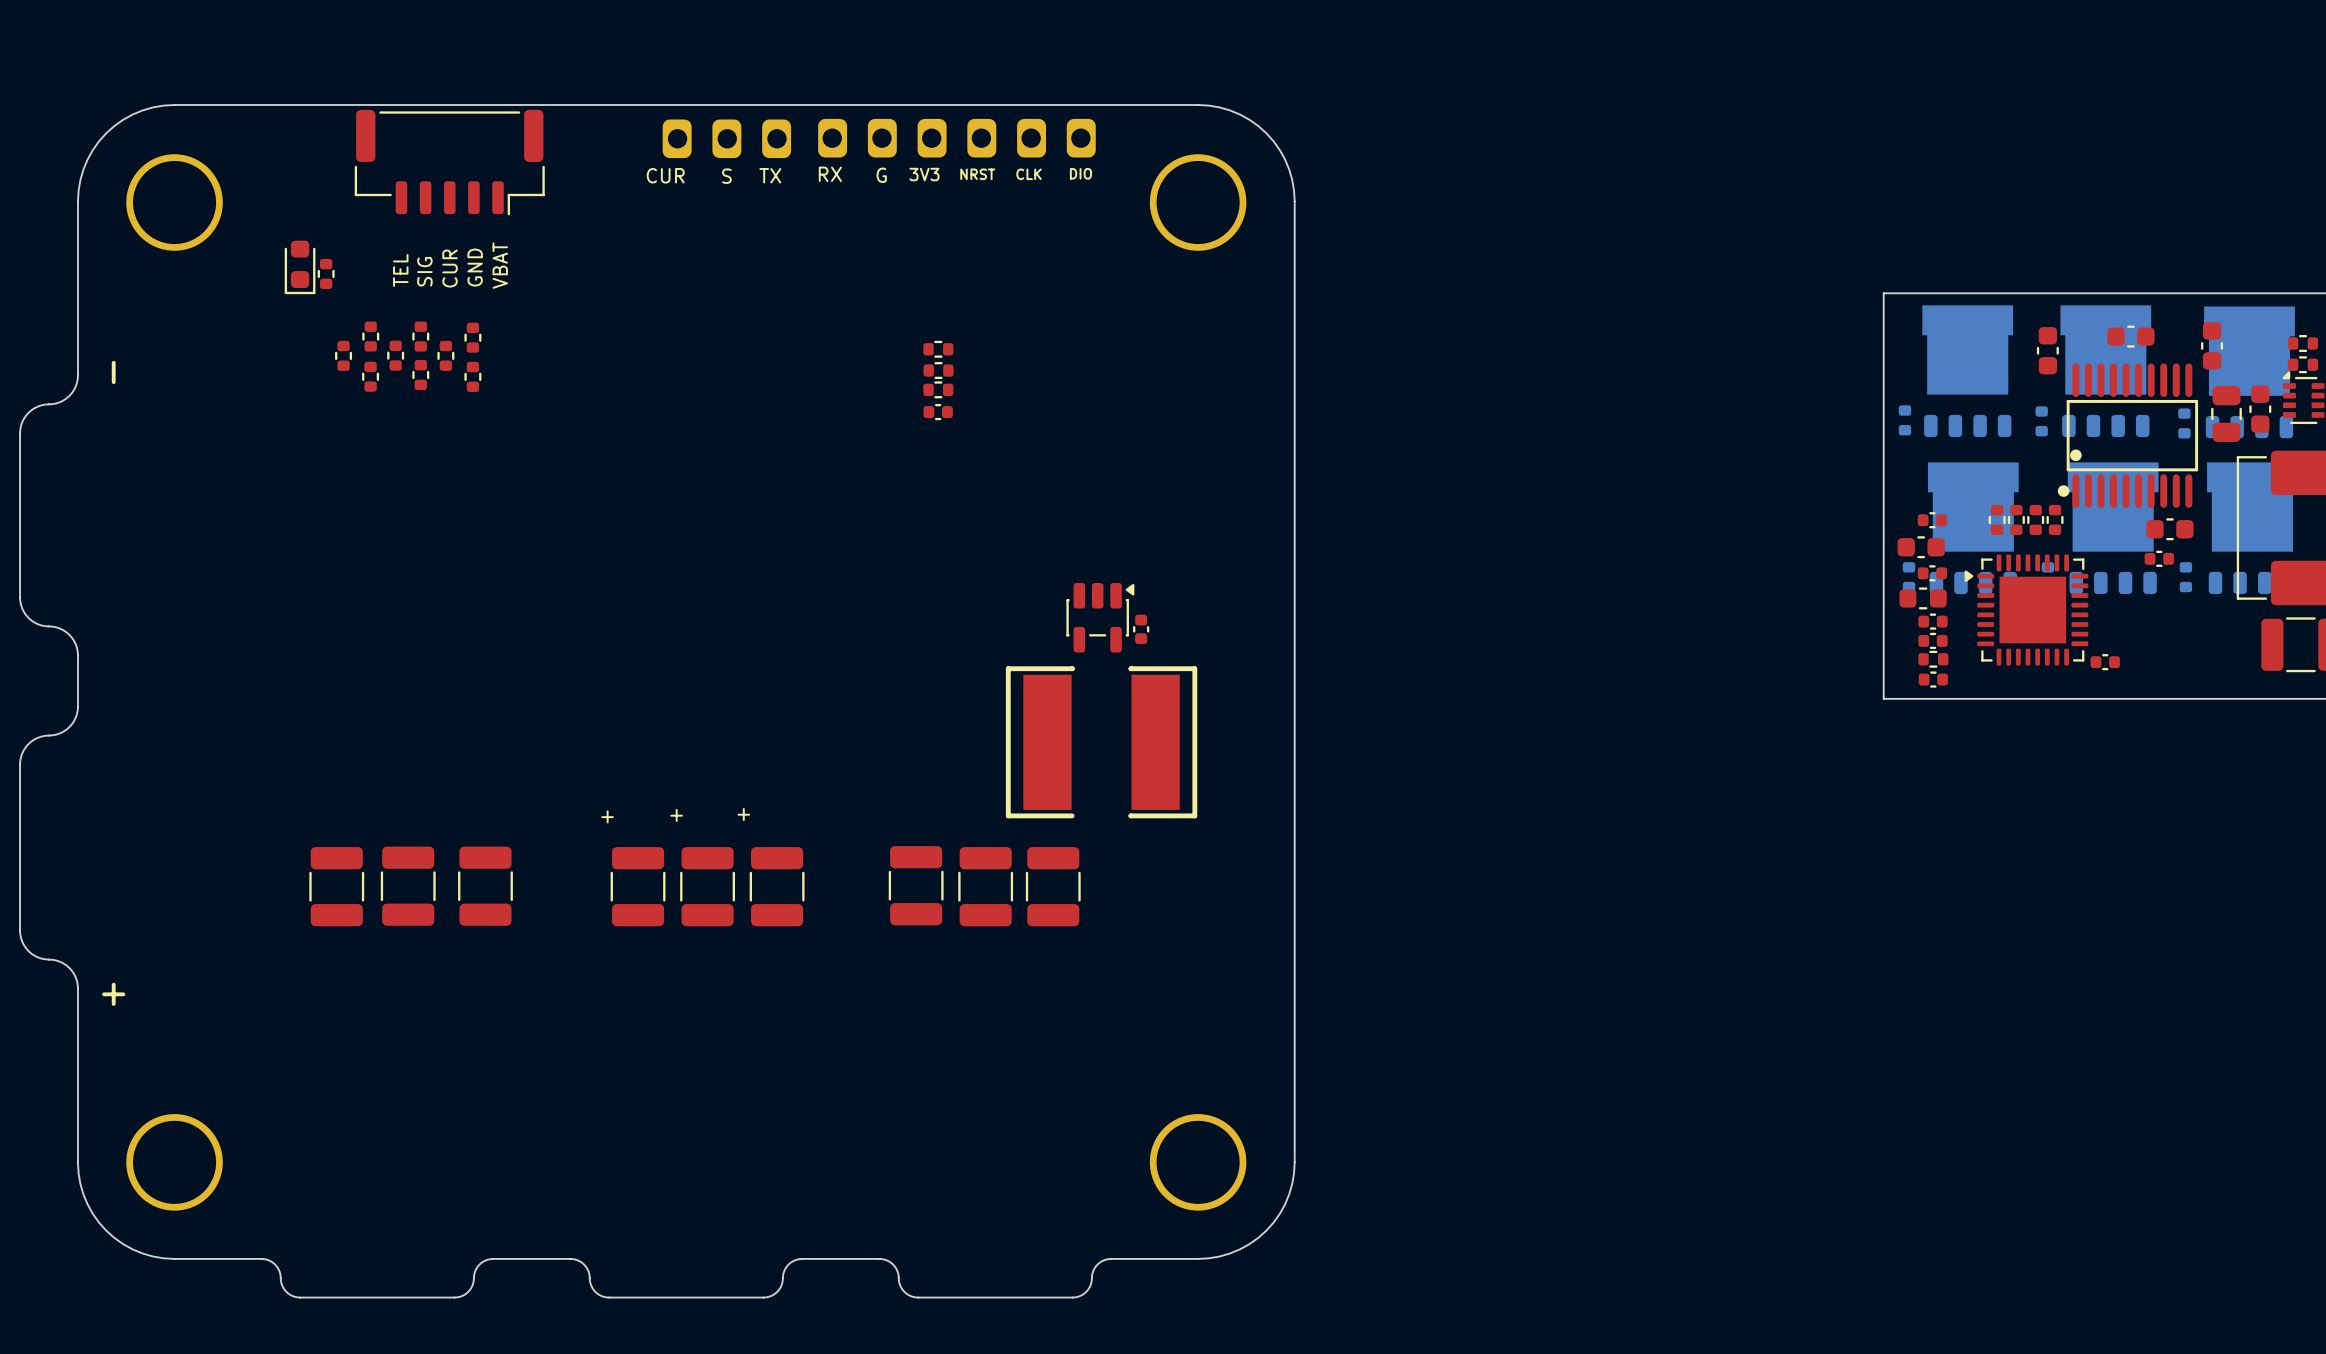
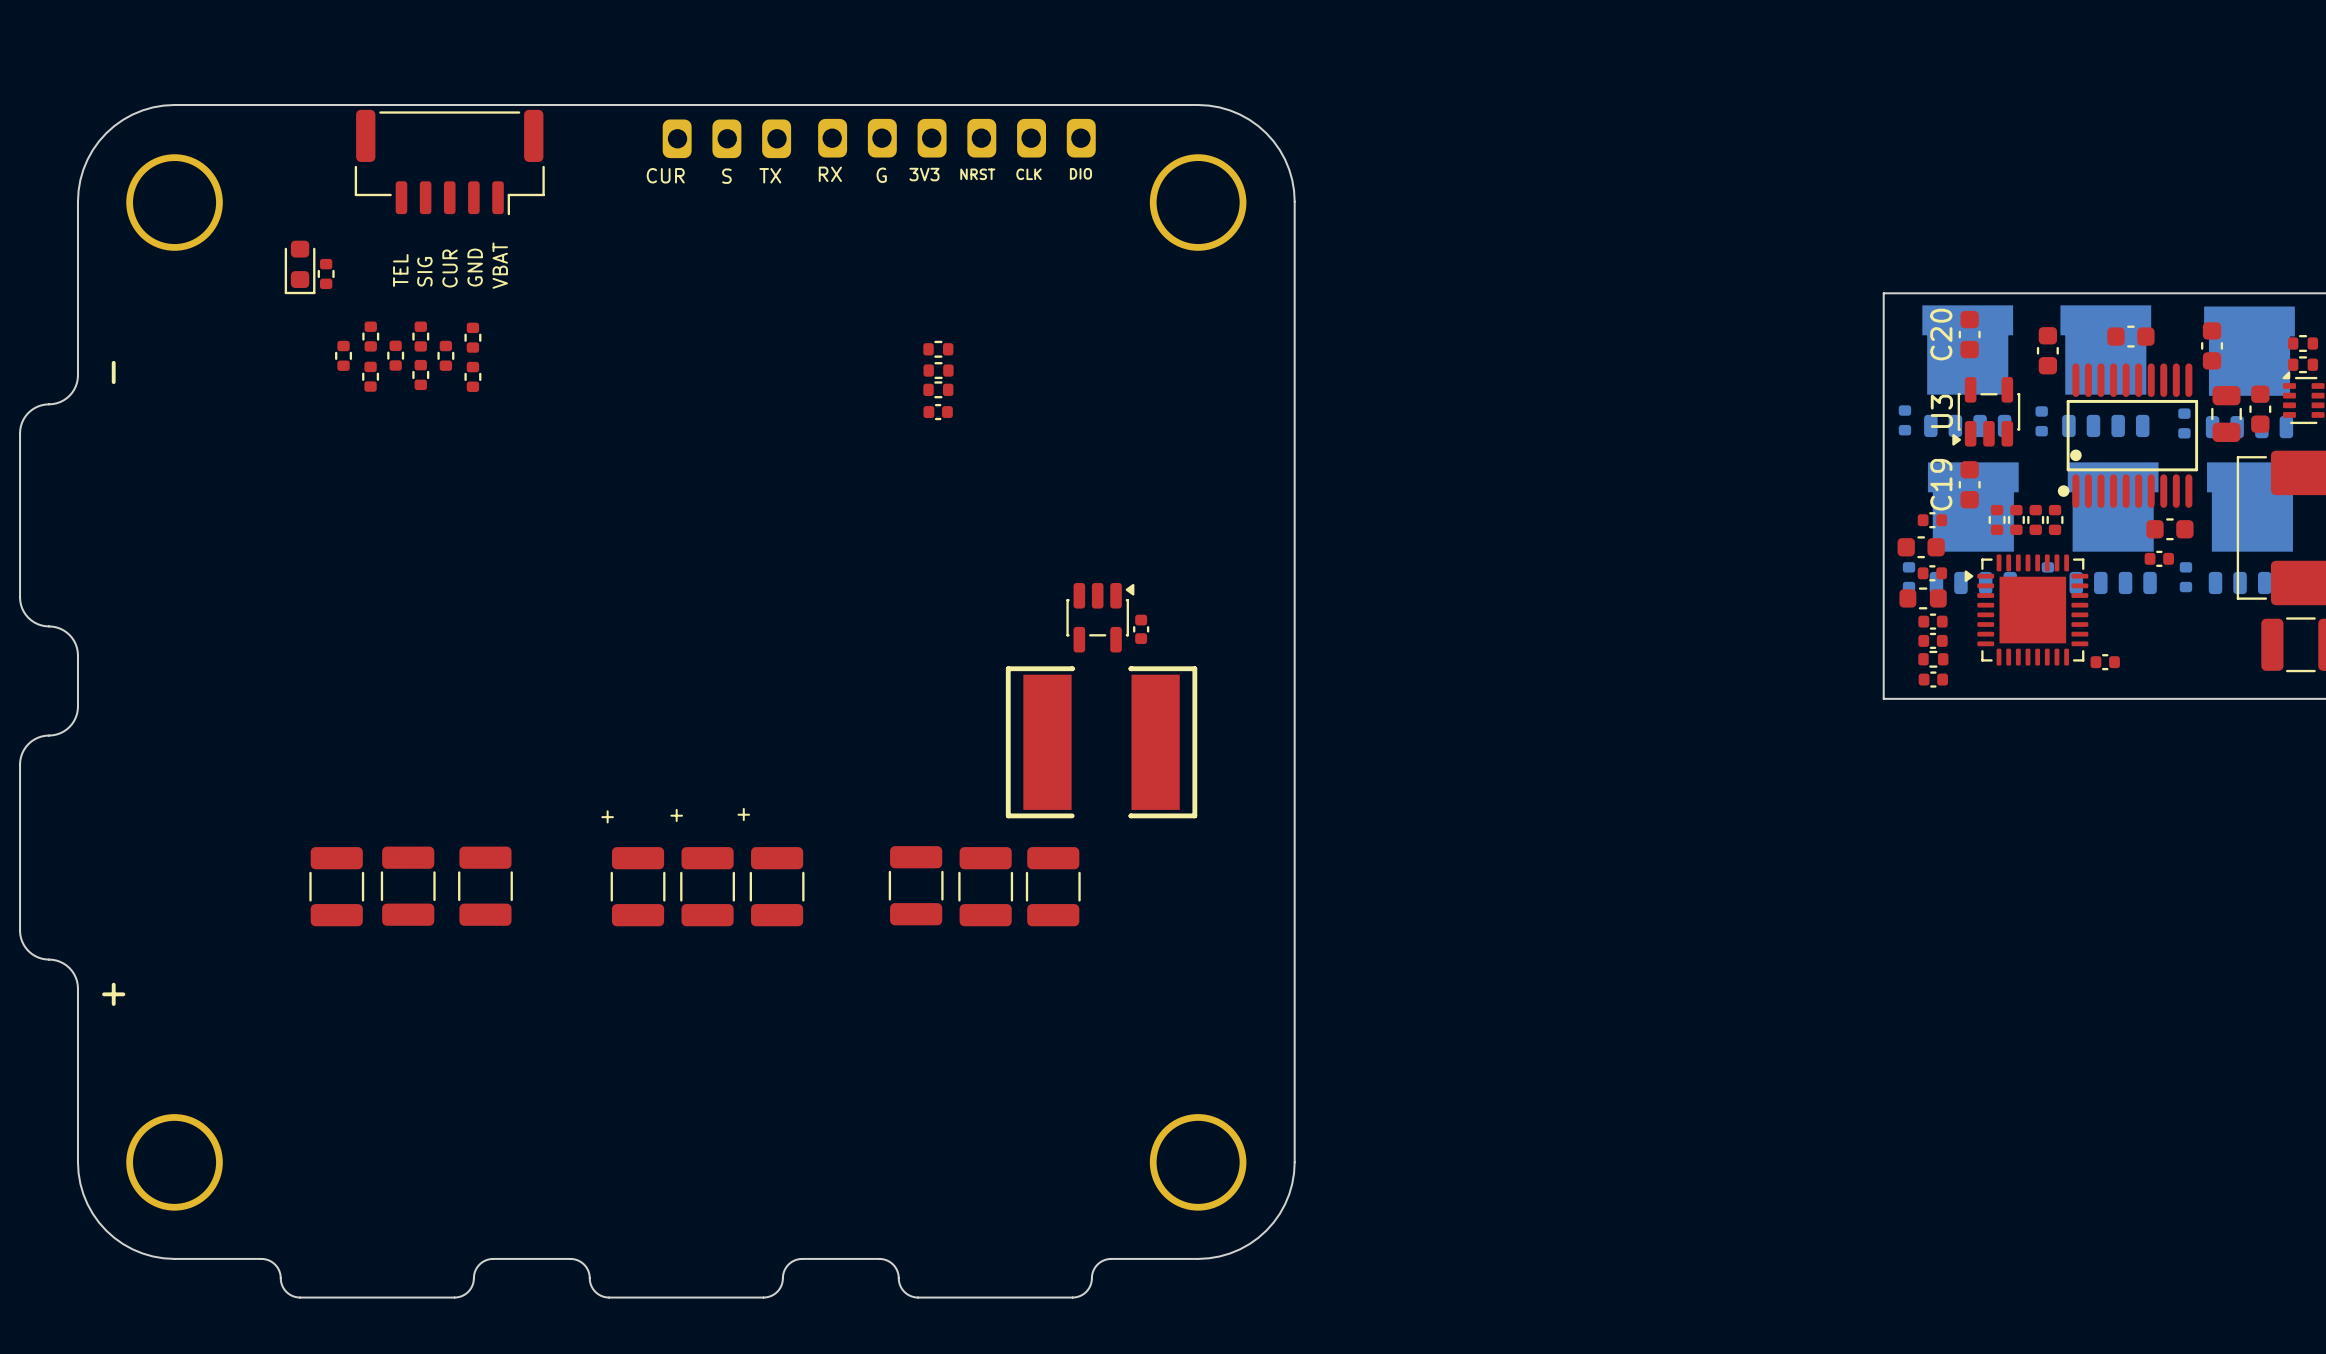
C20: none -> (1969, 334)
U3: none -> (1986, 411)
C19: none -> (1969, 484)

